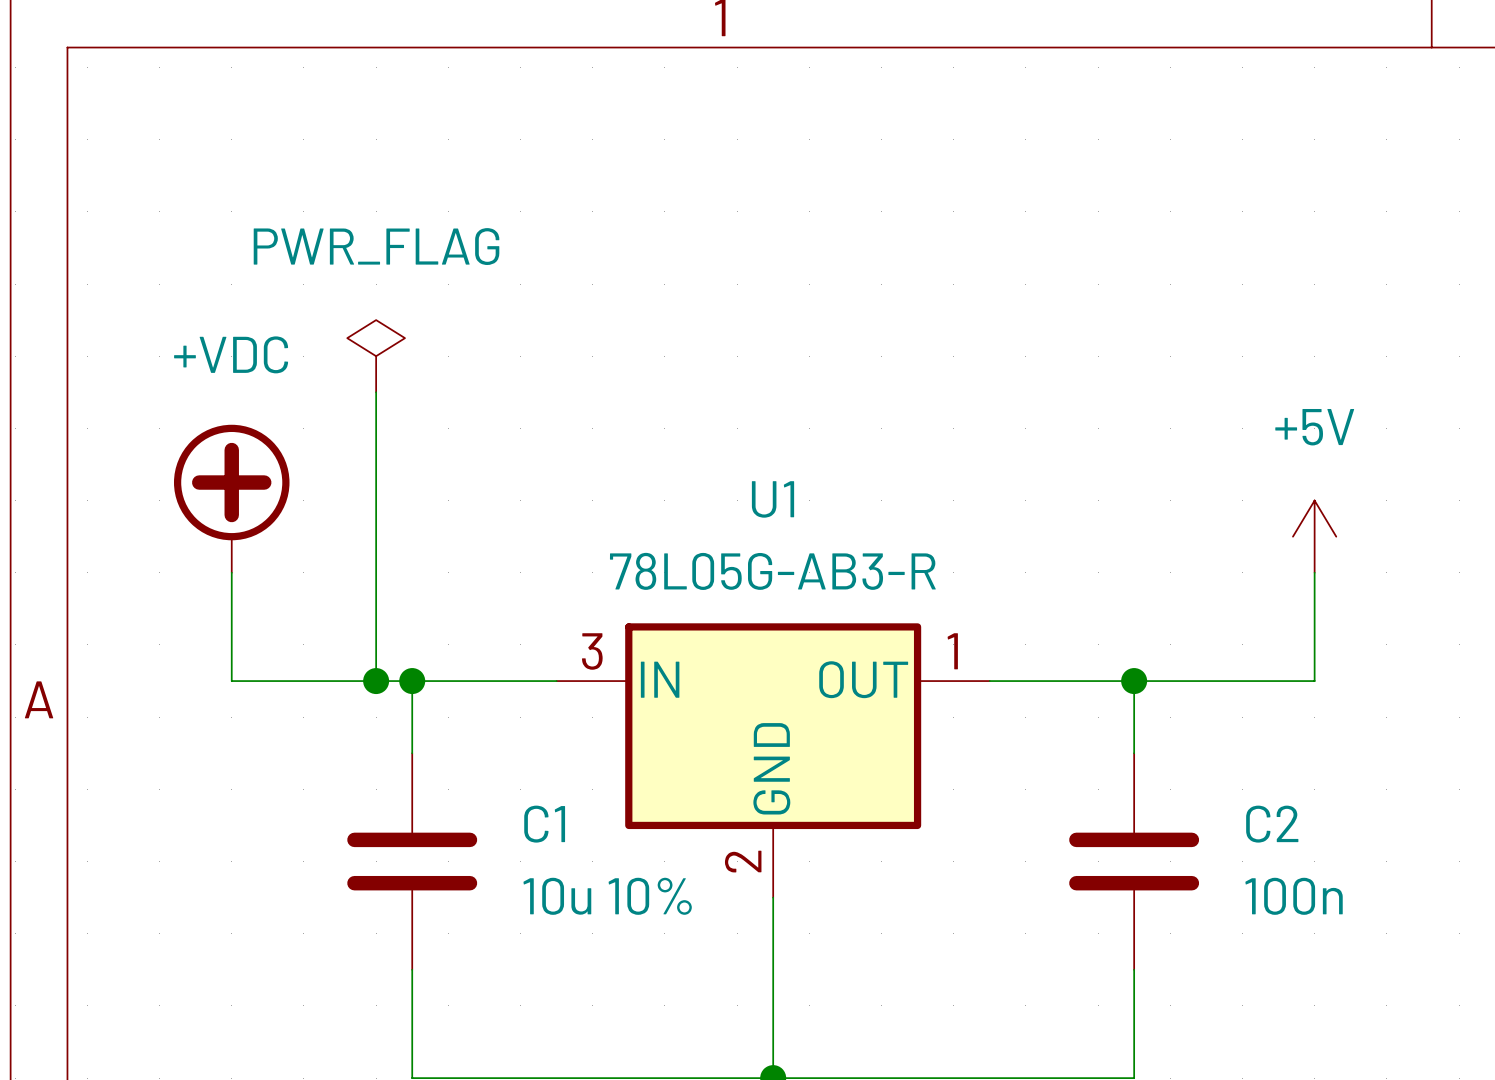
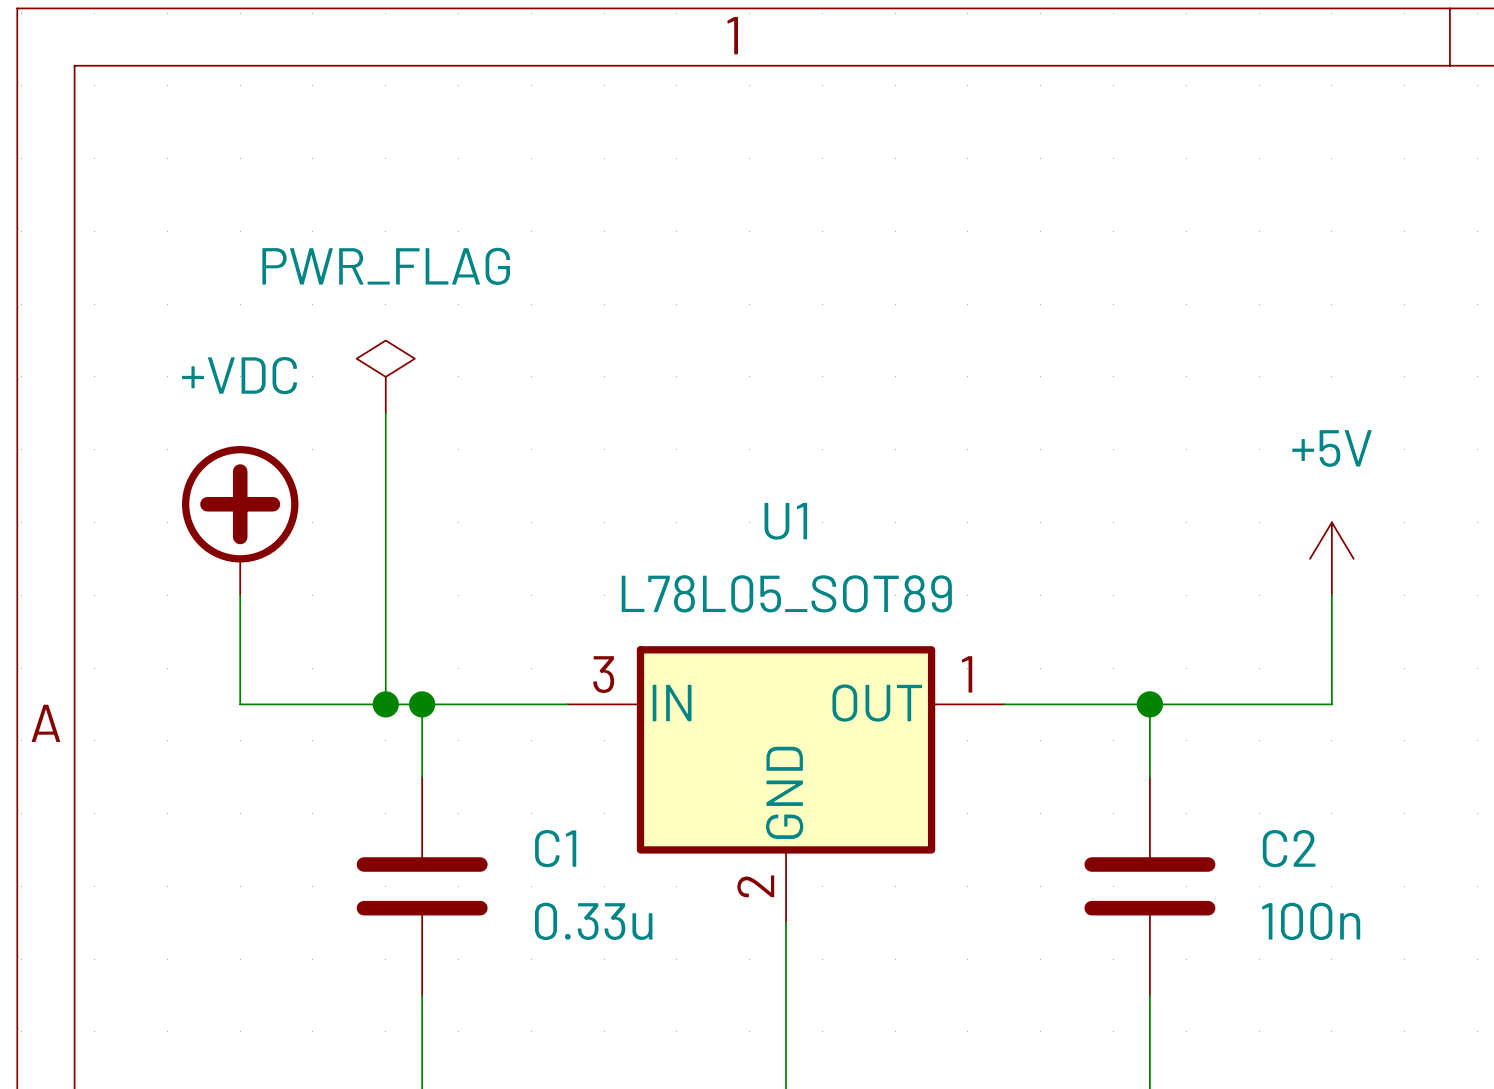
U1 value: 78L05G-AB3-R (772, 571) -> L78L05_SOT89 (786, 593)
C1 value: 10u 10% (607, 896) -> 0.33u (593, 921)

